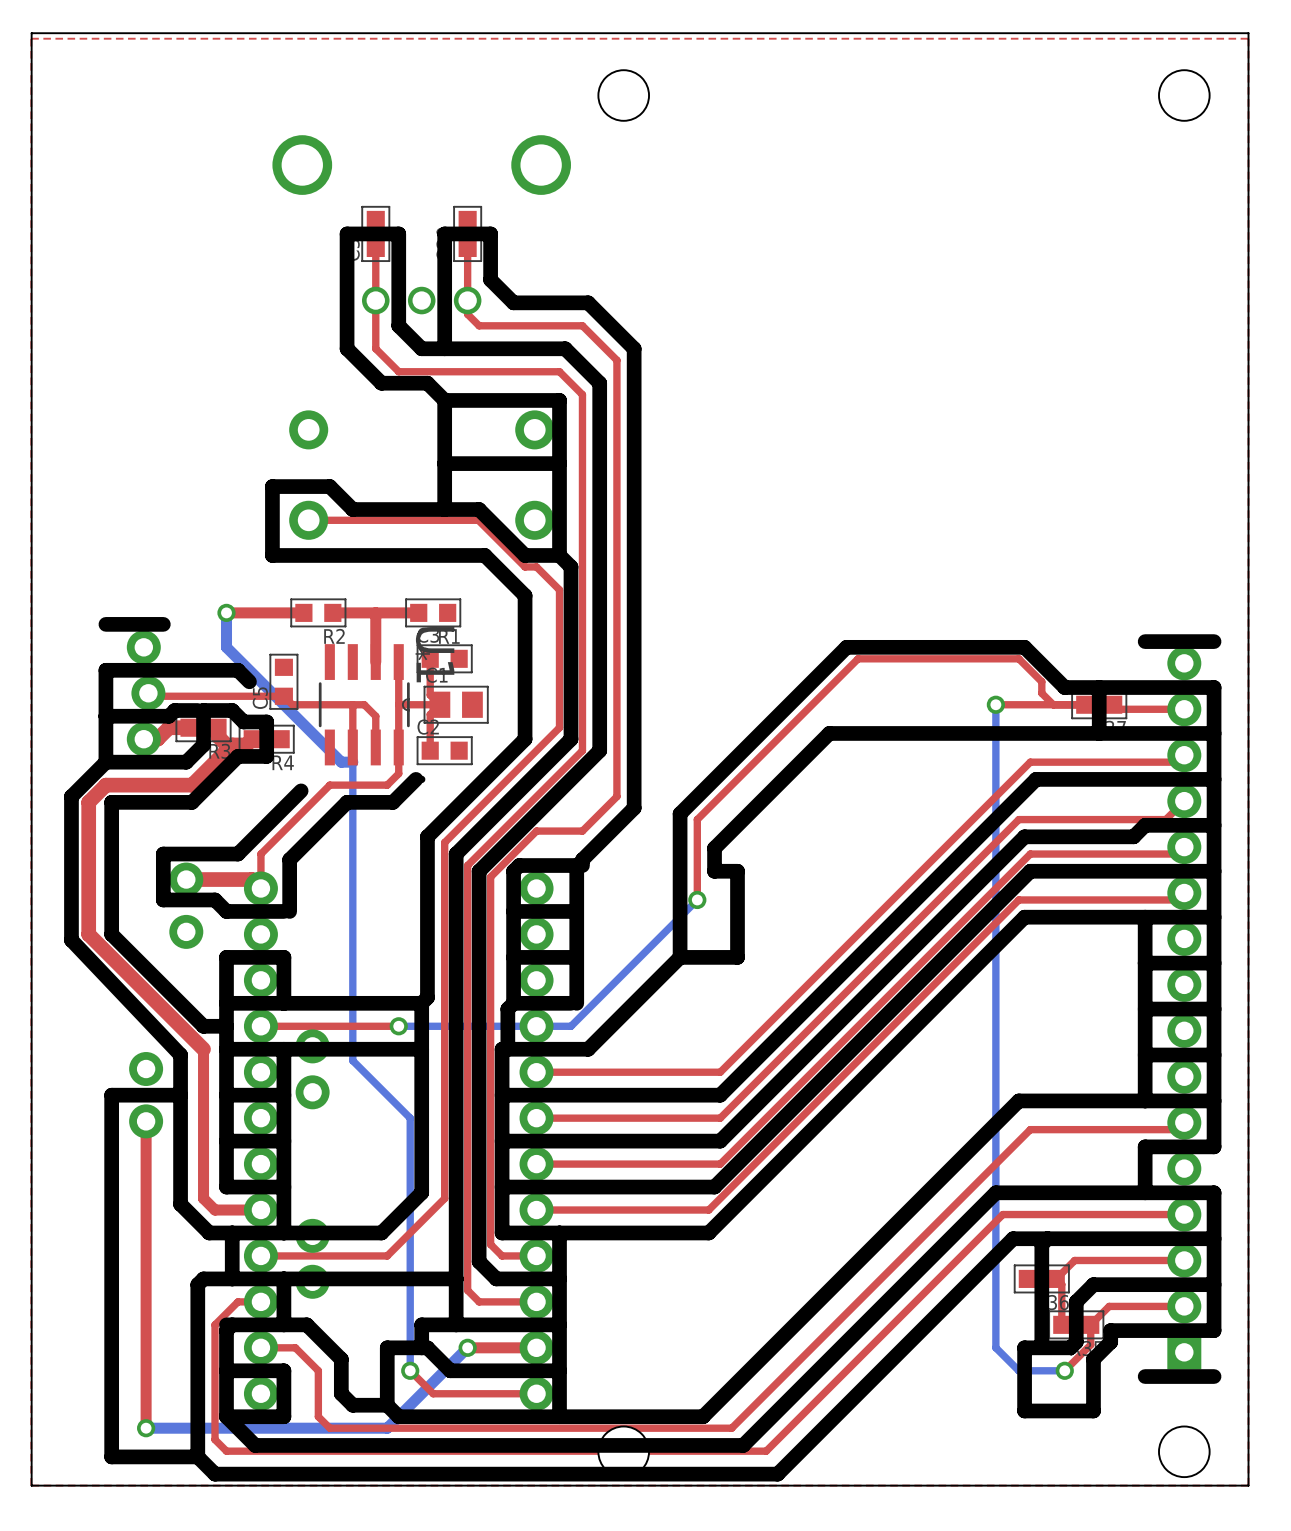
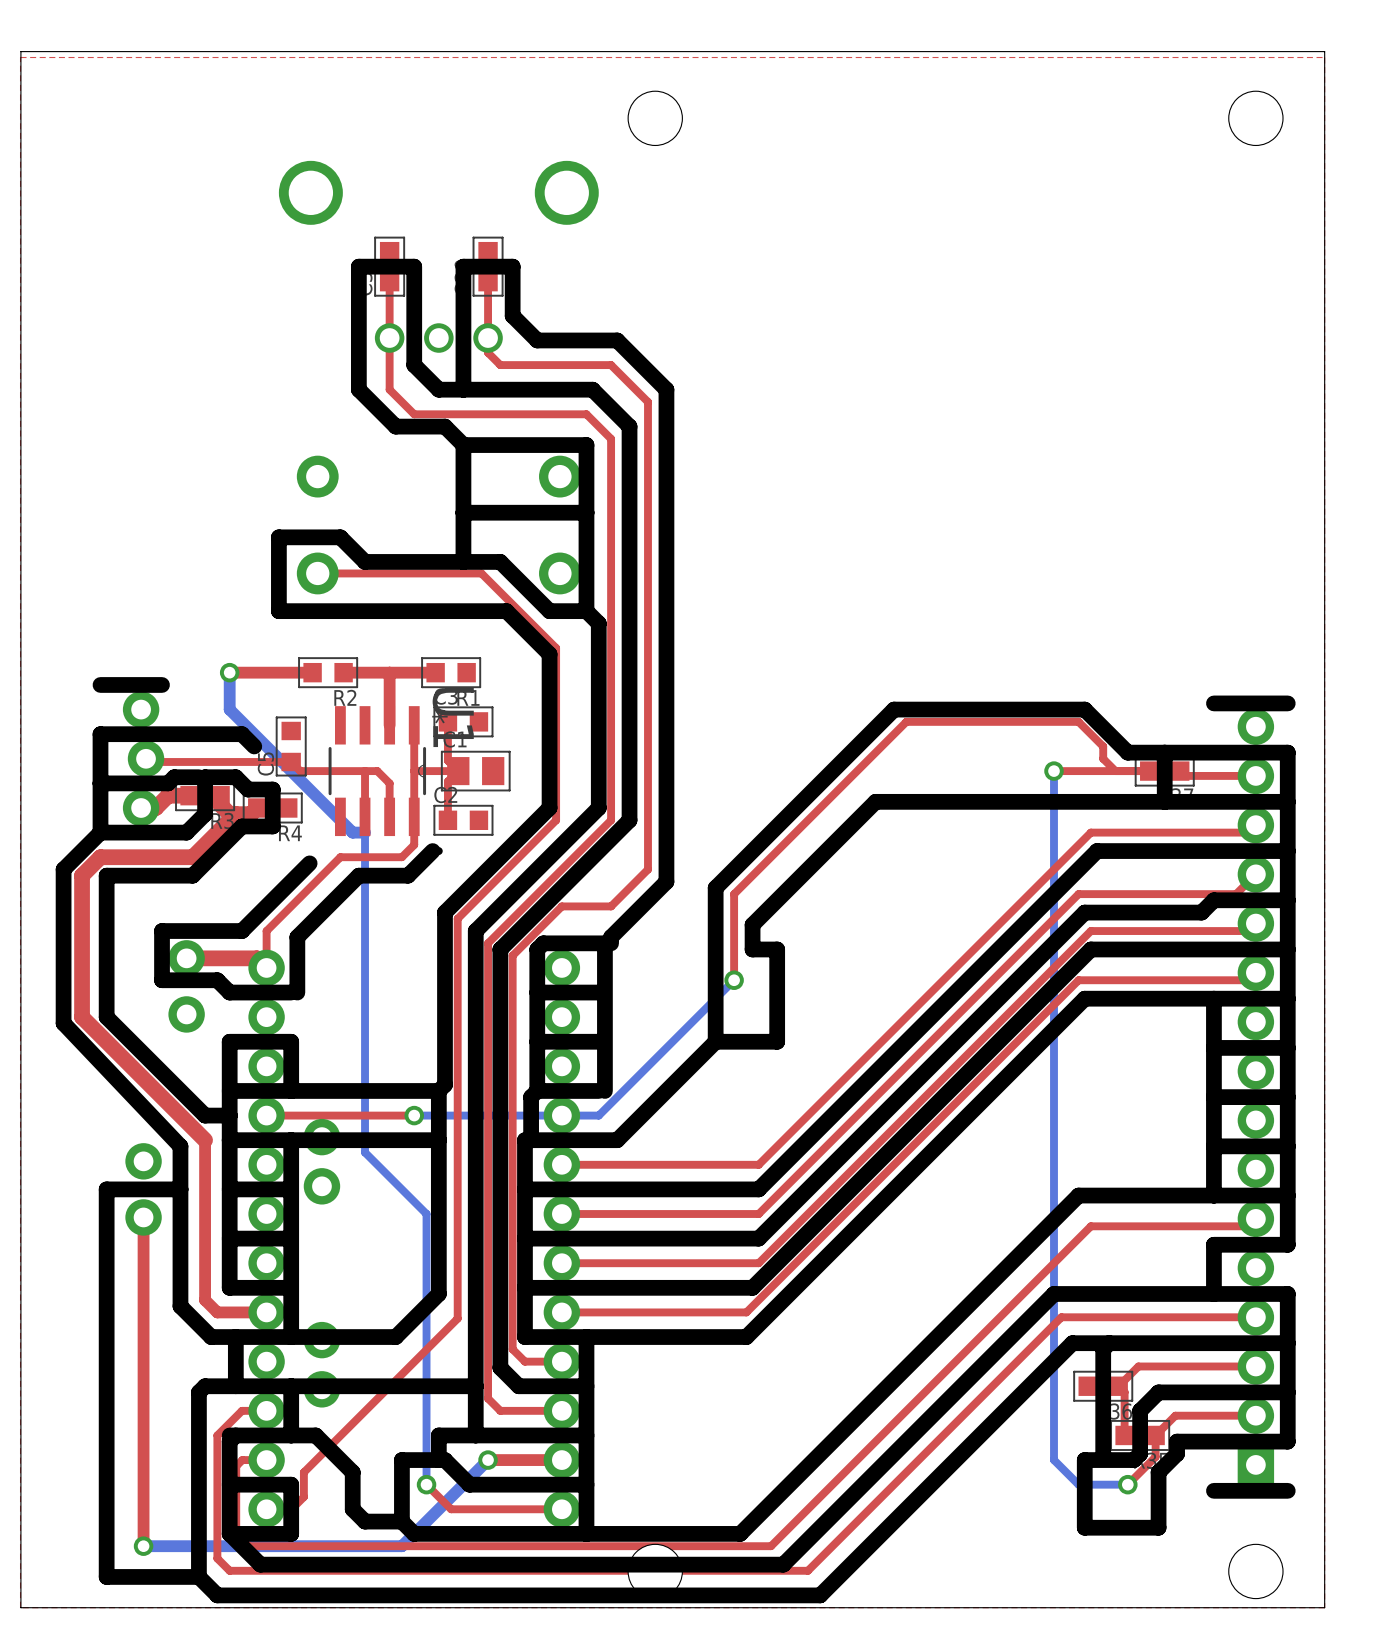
top track: (461, 520) (478, 520) (525, 566) (536, 566) (559, 589) (559, 727) (444, 842) (444, 1198) (387, 1255) (260, 1255) -> (481, 573) (556, 648) (556, 820) (457, 918) (457, 1318) (303, 1472) (303, 1496) (291, 1509) (266, 1509)
top track: (261, 1347) (295, 1347) (318, 1370) (318, 1416) (329, 1428) -> (266, 1460) (242, 1460) (236, 1466) (236, 1533) (248, 1546) (340, 1546)

